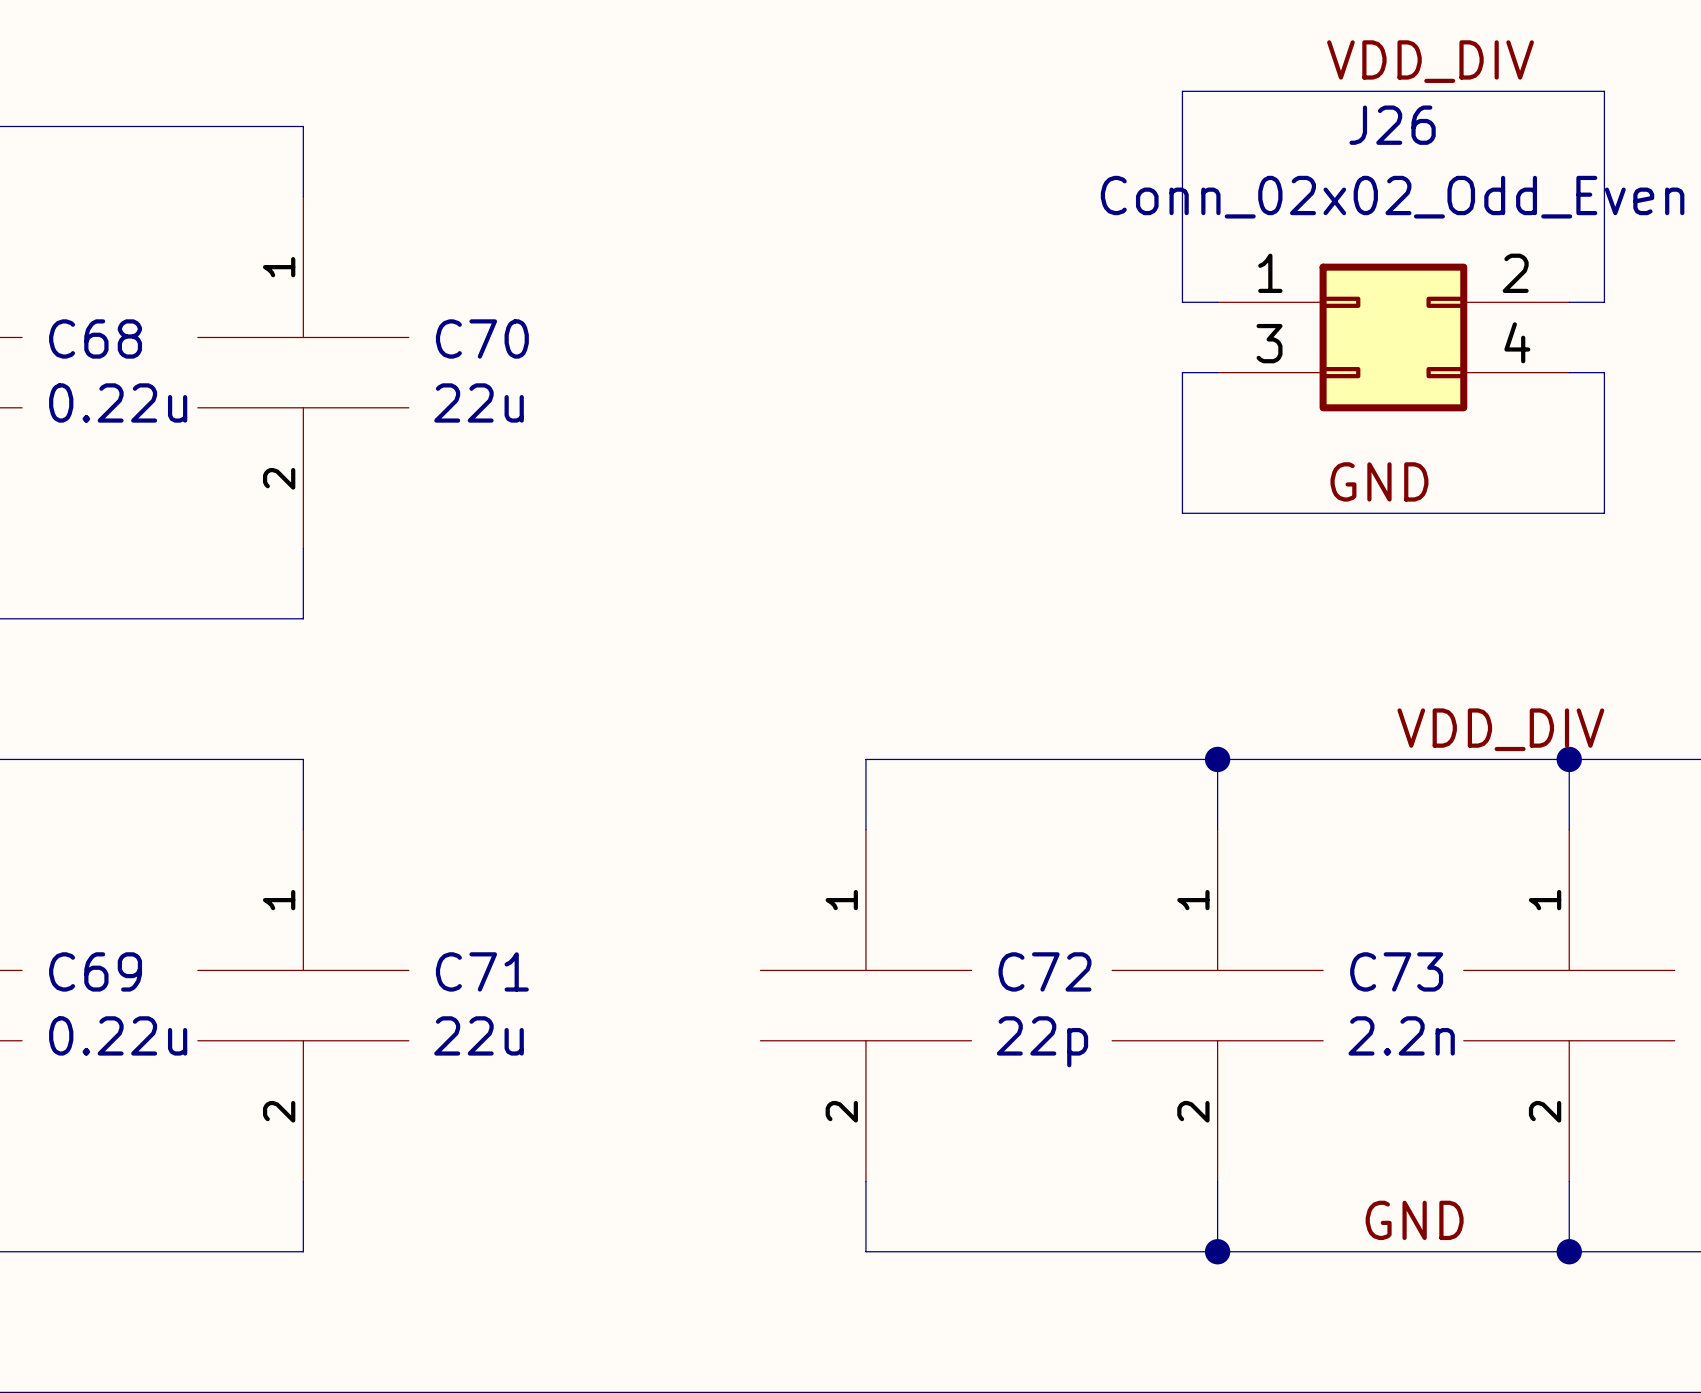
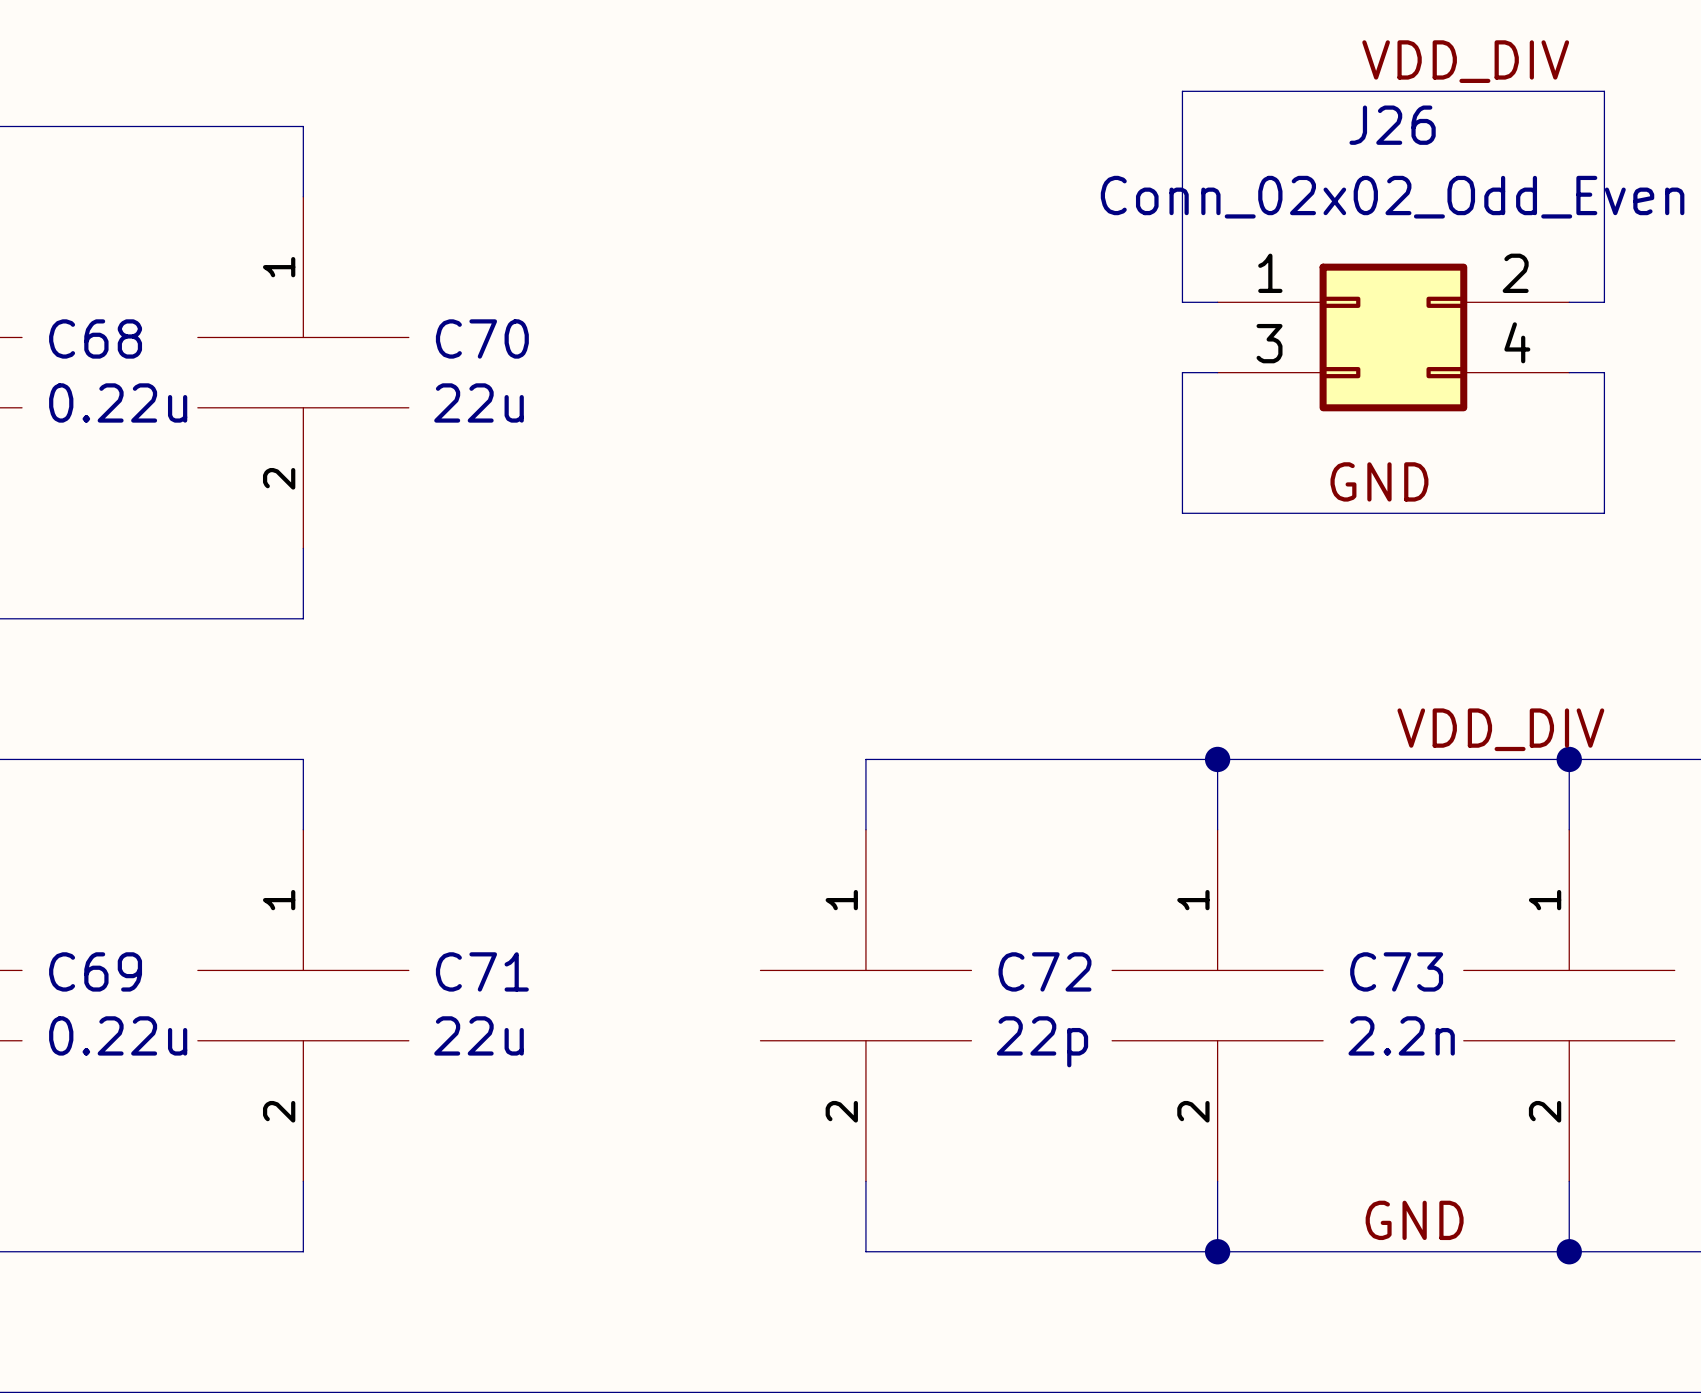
label position: VDD_DIV (1430, 61) -> VDD_DIV (1465, 61)

